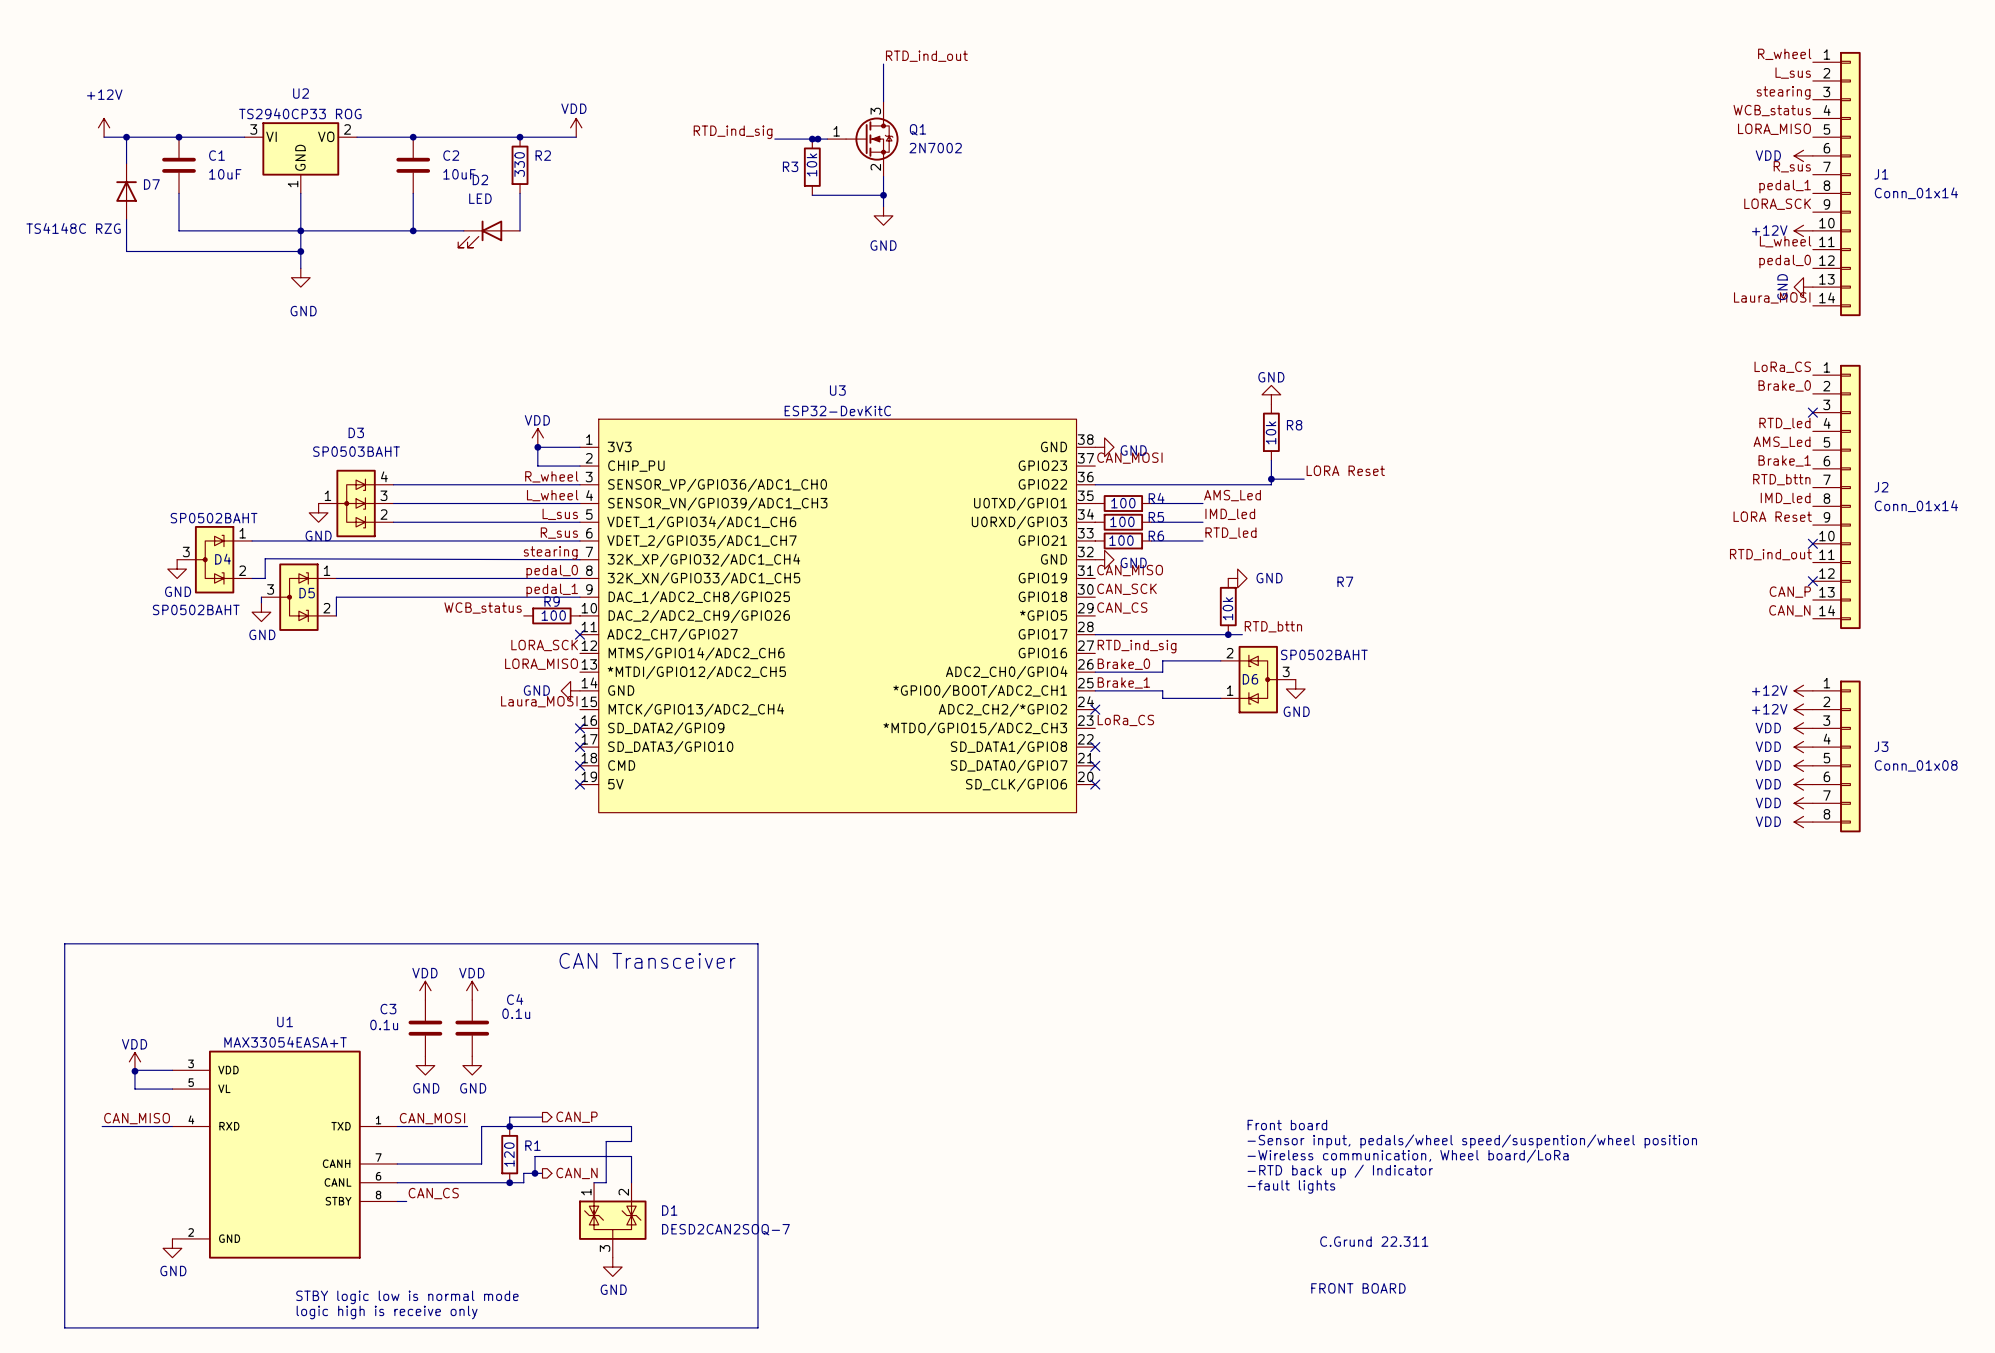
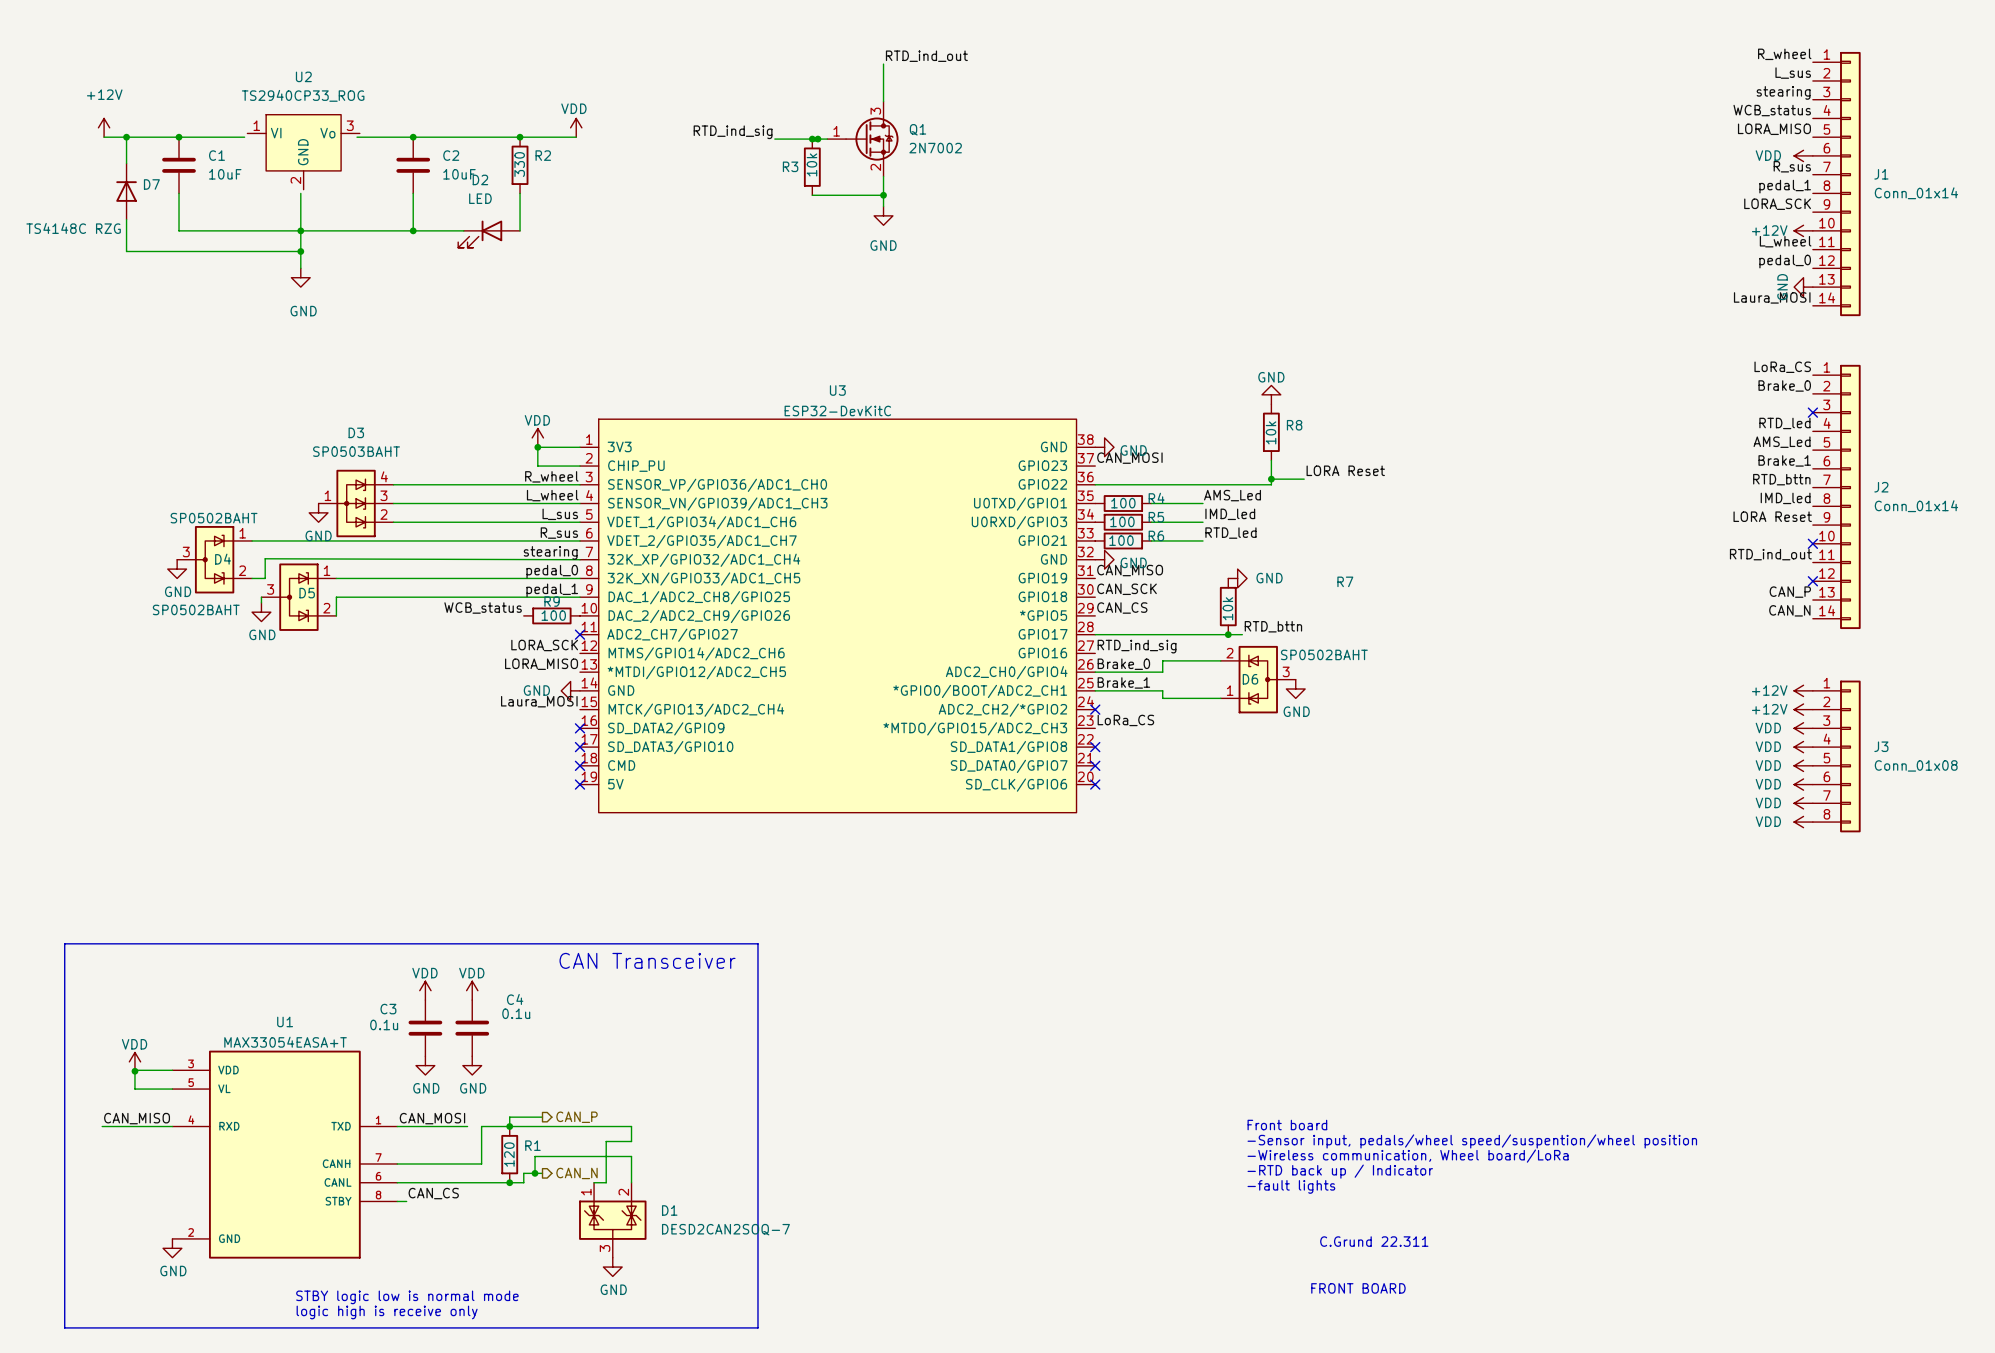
U2 value: TS2940CP33 ROG (300, 113) -> TS2940CP33_ROG (303, 95)
U2 symbol: [244, 122, 358, 194] -> [247, 114, 360, 190]

